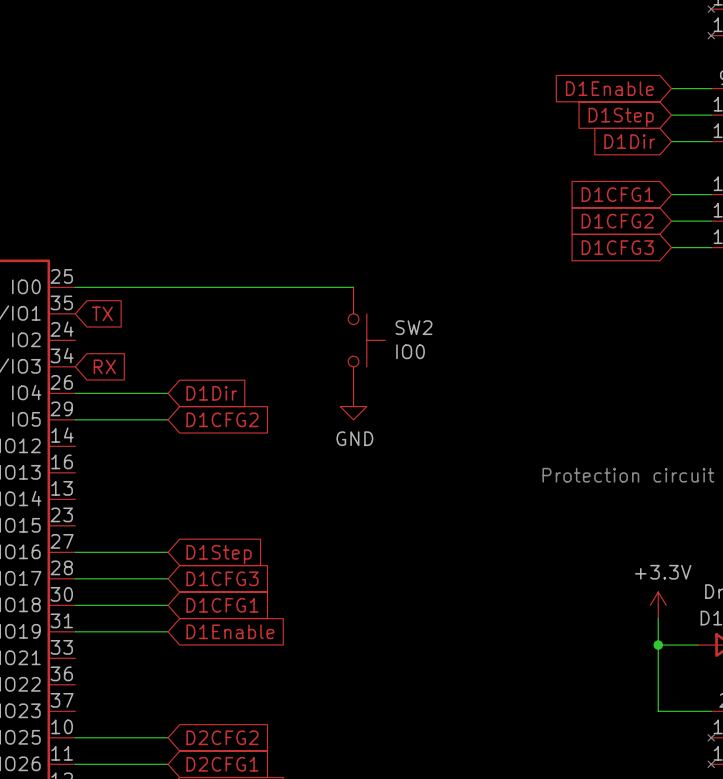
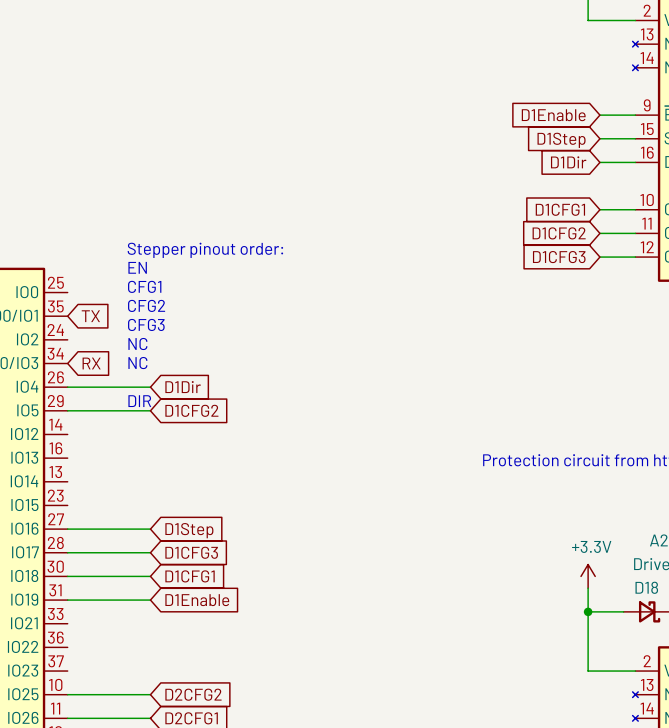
text: none -> Stepper pinout order: (205, 250)
text: none -> EN (137, 267)
text: none -> CFG1 (144, 286)
wire: (75, 287) (353, 287) -> none
text: none -> CFG2 (146, 305)
text: none -> CFG3 (146, 324)
SW2: IO0 (366, 340) -> none
text: none -> NC (137, 344)
text: none -> NC (137, 363)
power symbol: GND (353, 406) -> none
text: none -> DIR (139, 401)

